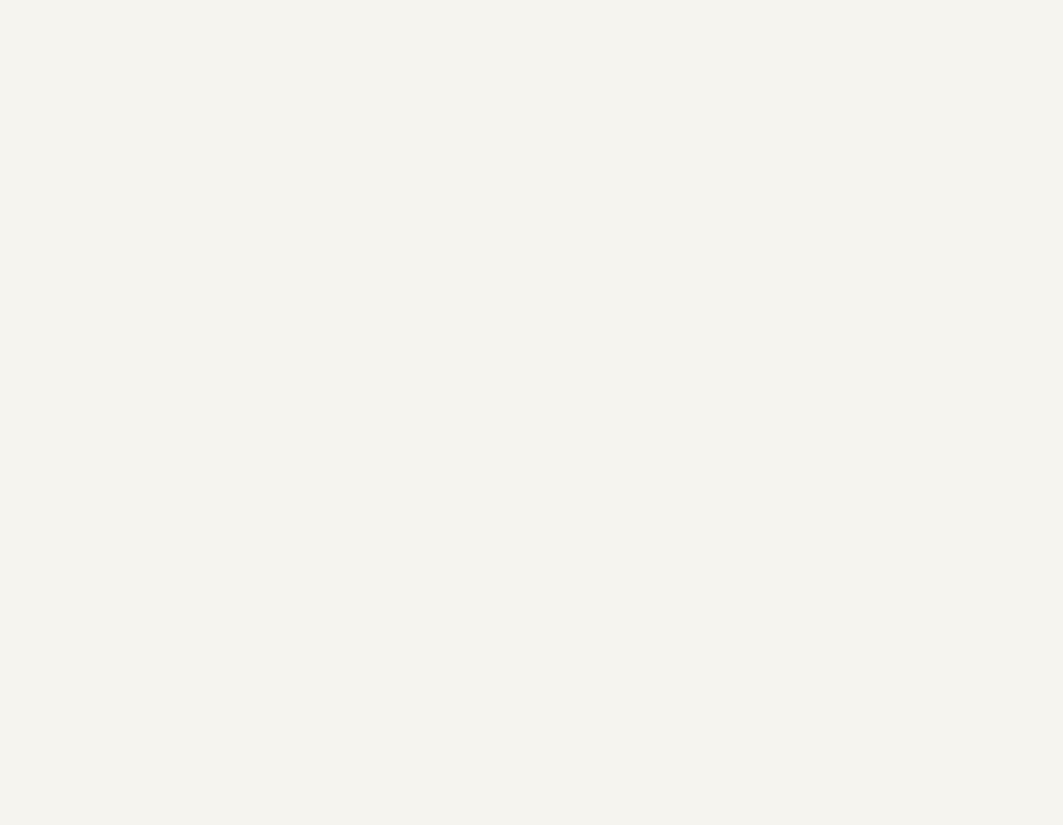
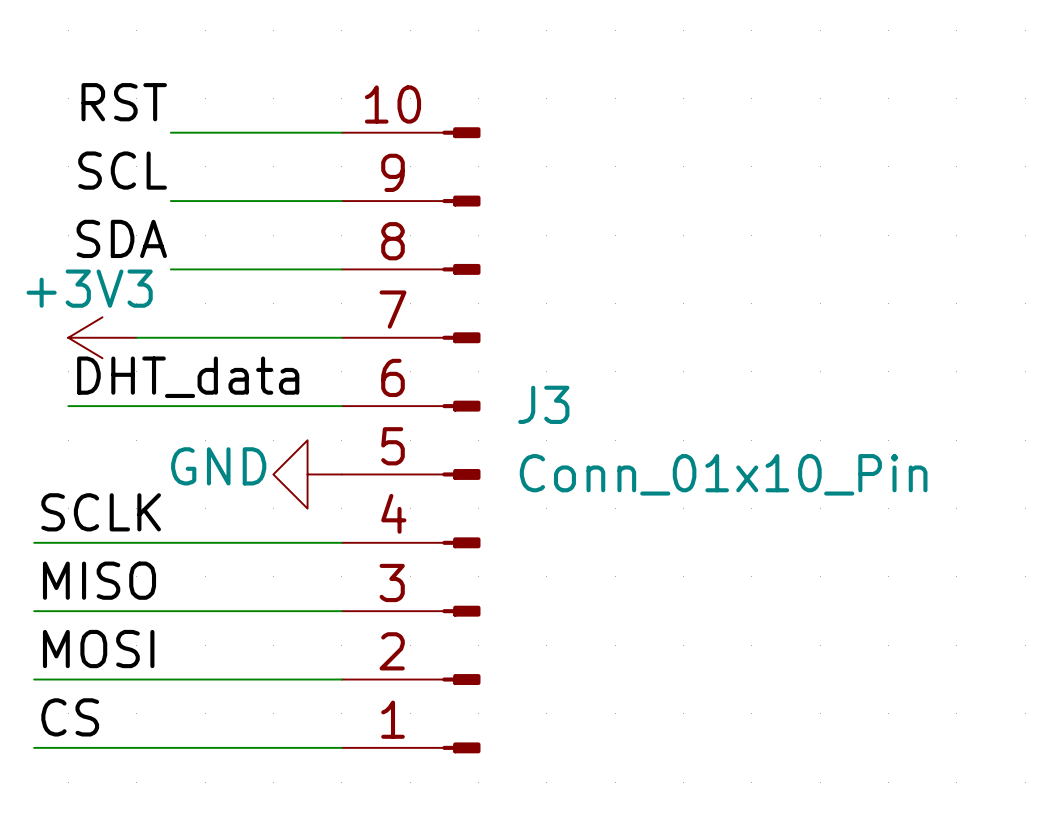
label: none -> RST (124, 102)
wire: none -> (170, 132) (341, 132)
label: none -> SCL (122, 170)
wire: none -> (170, 201) (341, 201)
label: none -> SDA (121, 238)
wire: none -> (170, 269) (341, 269)
power symbol: none -> +3V3 (102, 337)
wire: none -> (136, 337) (341, 337)
label: none -> DHT_data (188, 377)
wire: none -> (68, 406) (341, 406)
J3: none -> Conn_01x10_Pin (411, 440)
power symbol: none -> GND (307, 474)
label: none -> SCLK (101, 512)
wire: none -> (34, 542) (341, 542)
label: none -> MISO (99, 580)
wire: none -> (34, 611) (341, 611)
label: none -> MOSI (98, 649)
wire: none -> (34, 679) (341, 679)
label: none -> CS (70, 717)
wire: none -> (34, 747) (341, 747)

